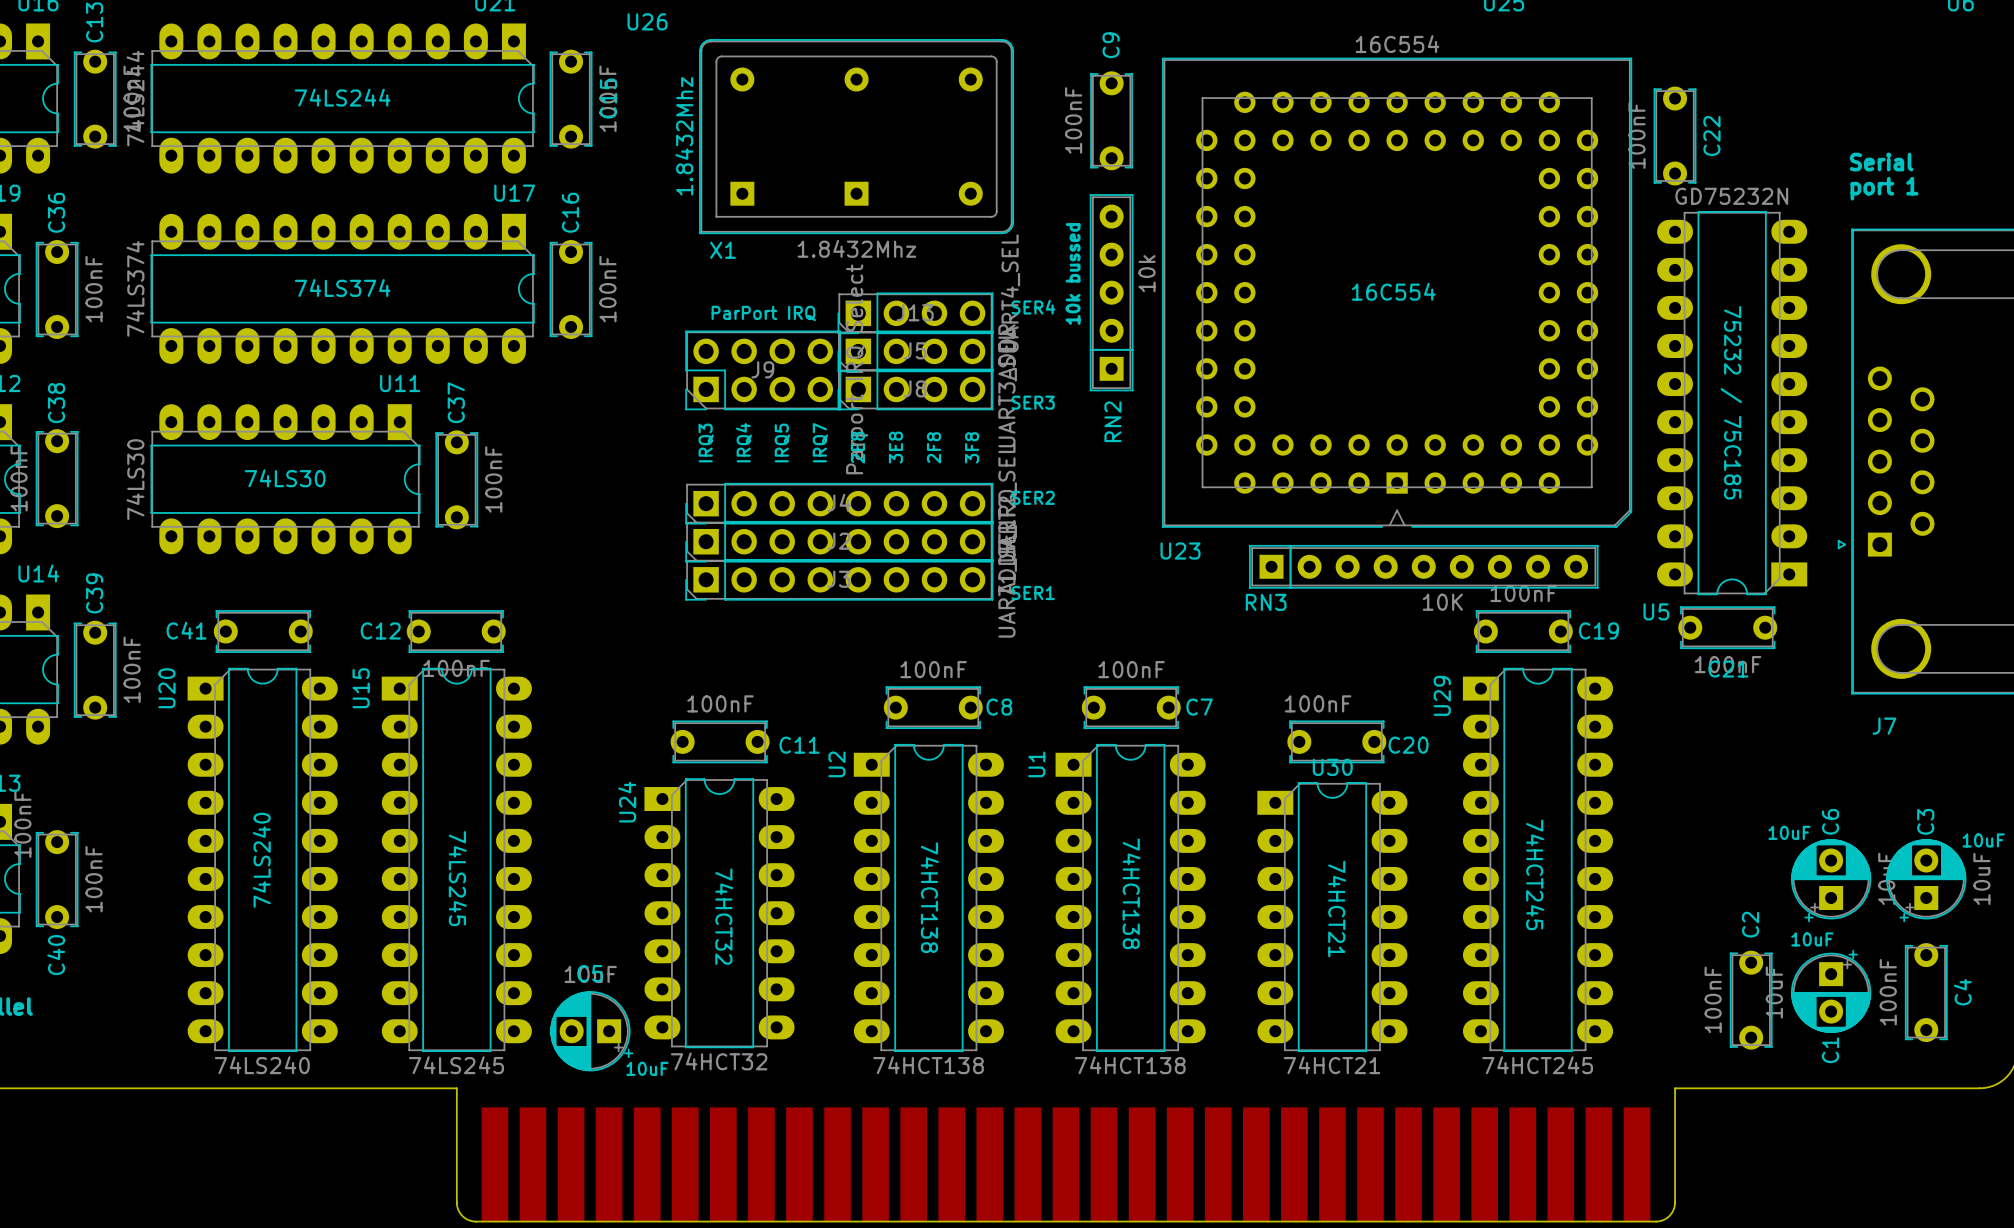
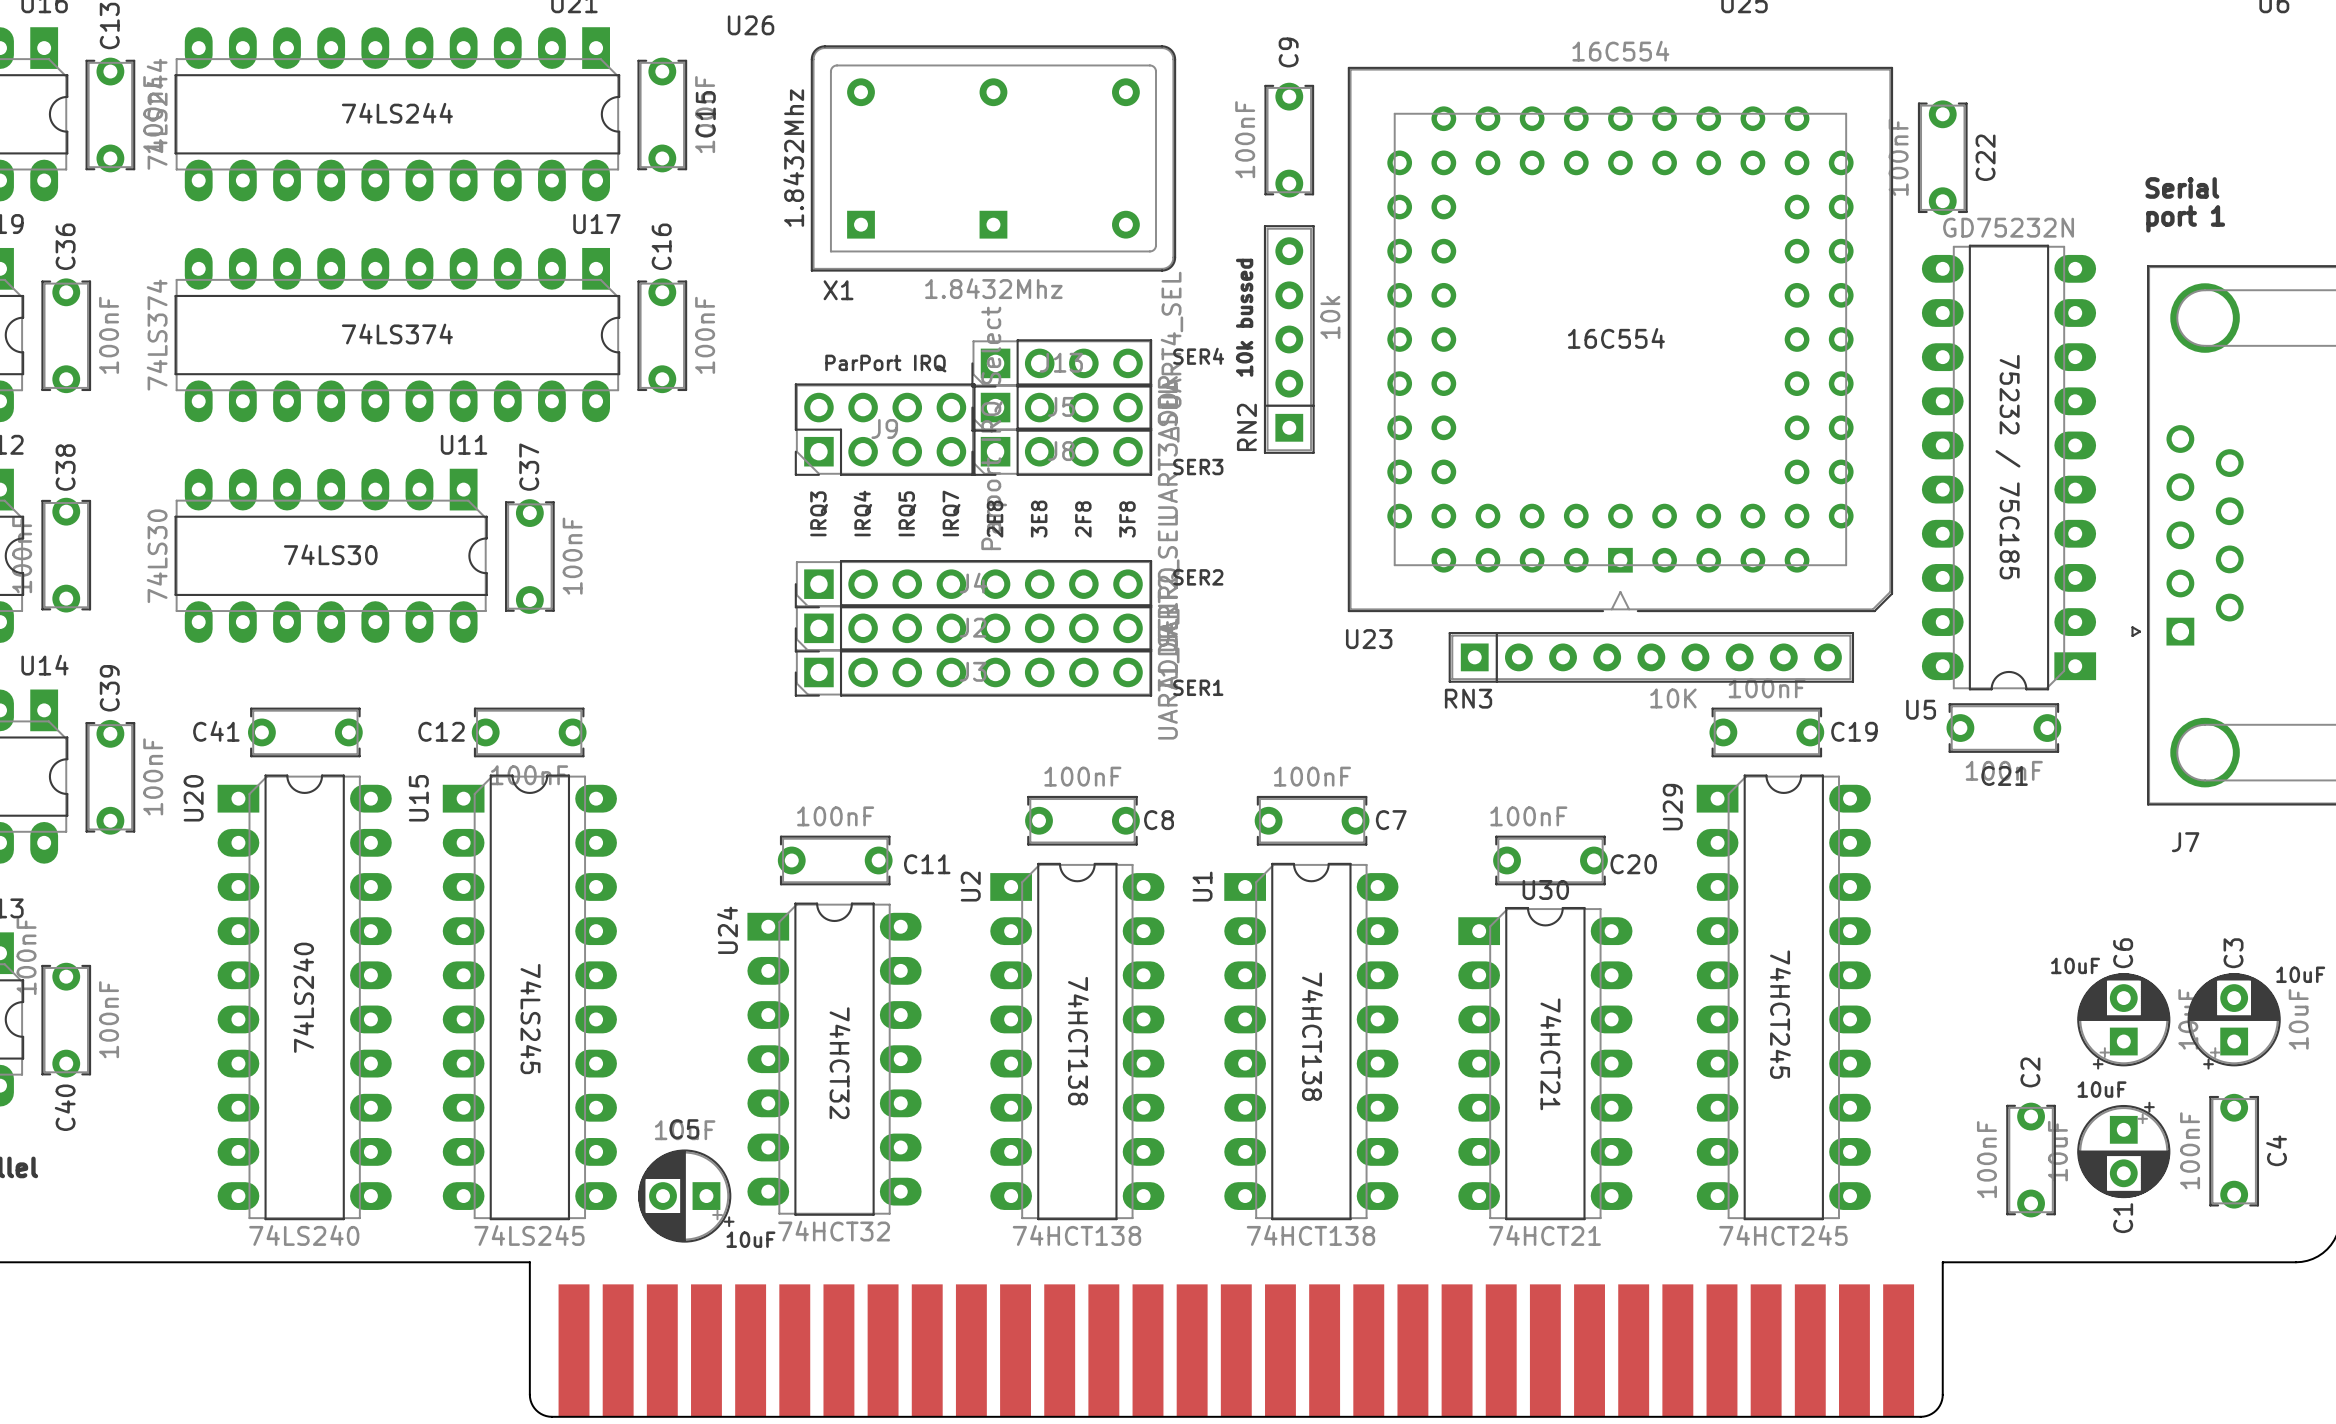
RN2 name position: RN2 (1112, 421) -> RN2 (1246, 427)

